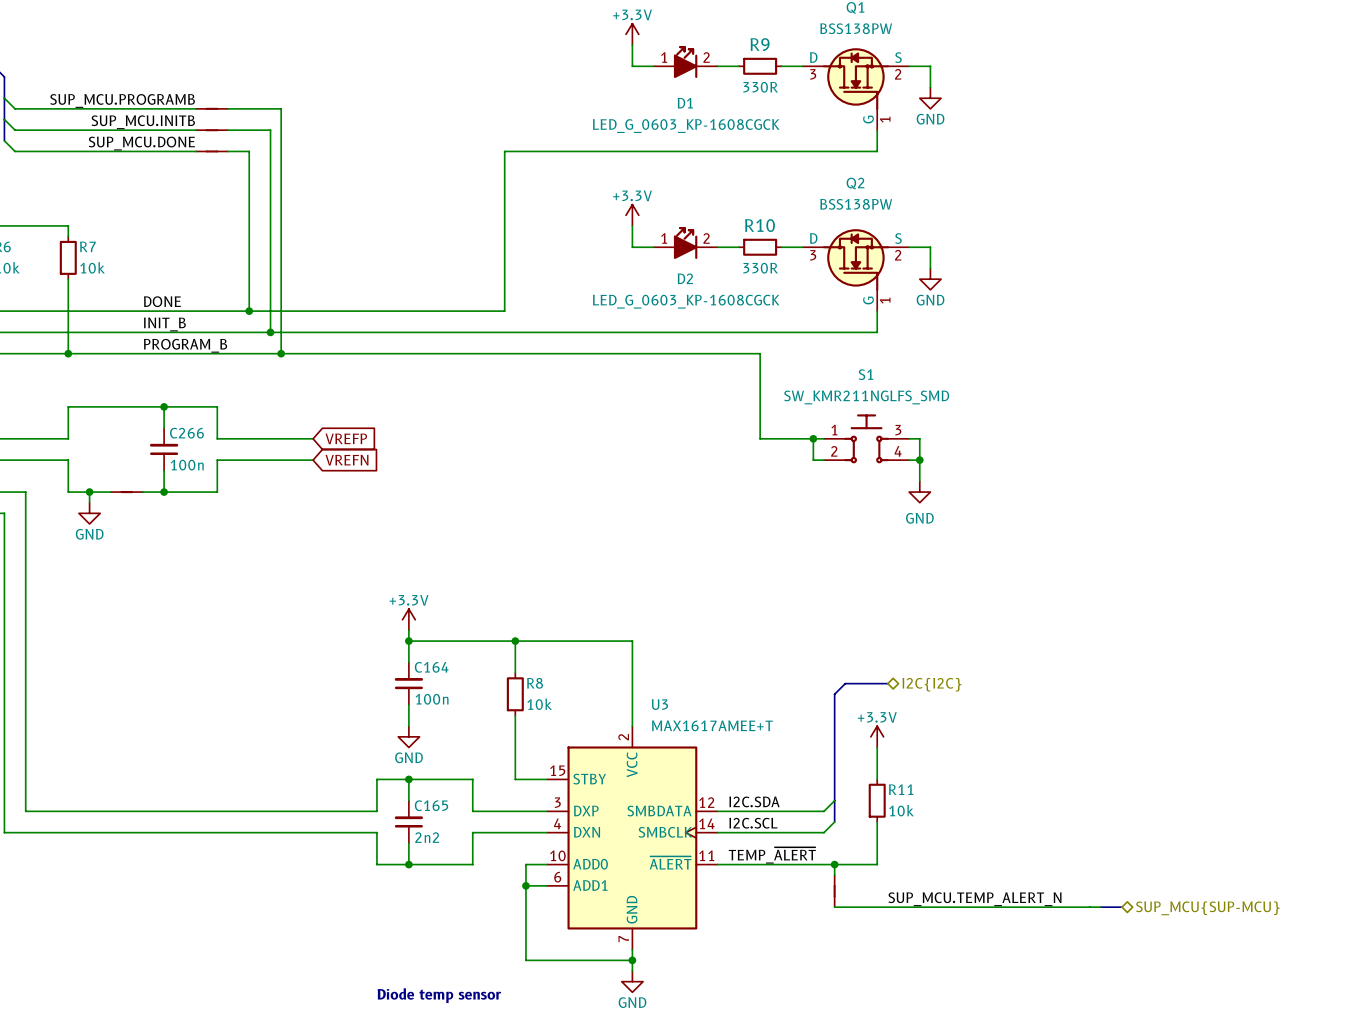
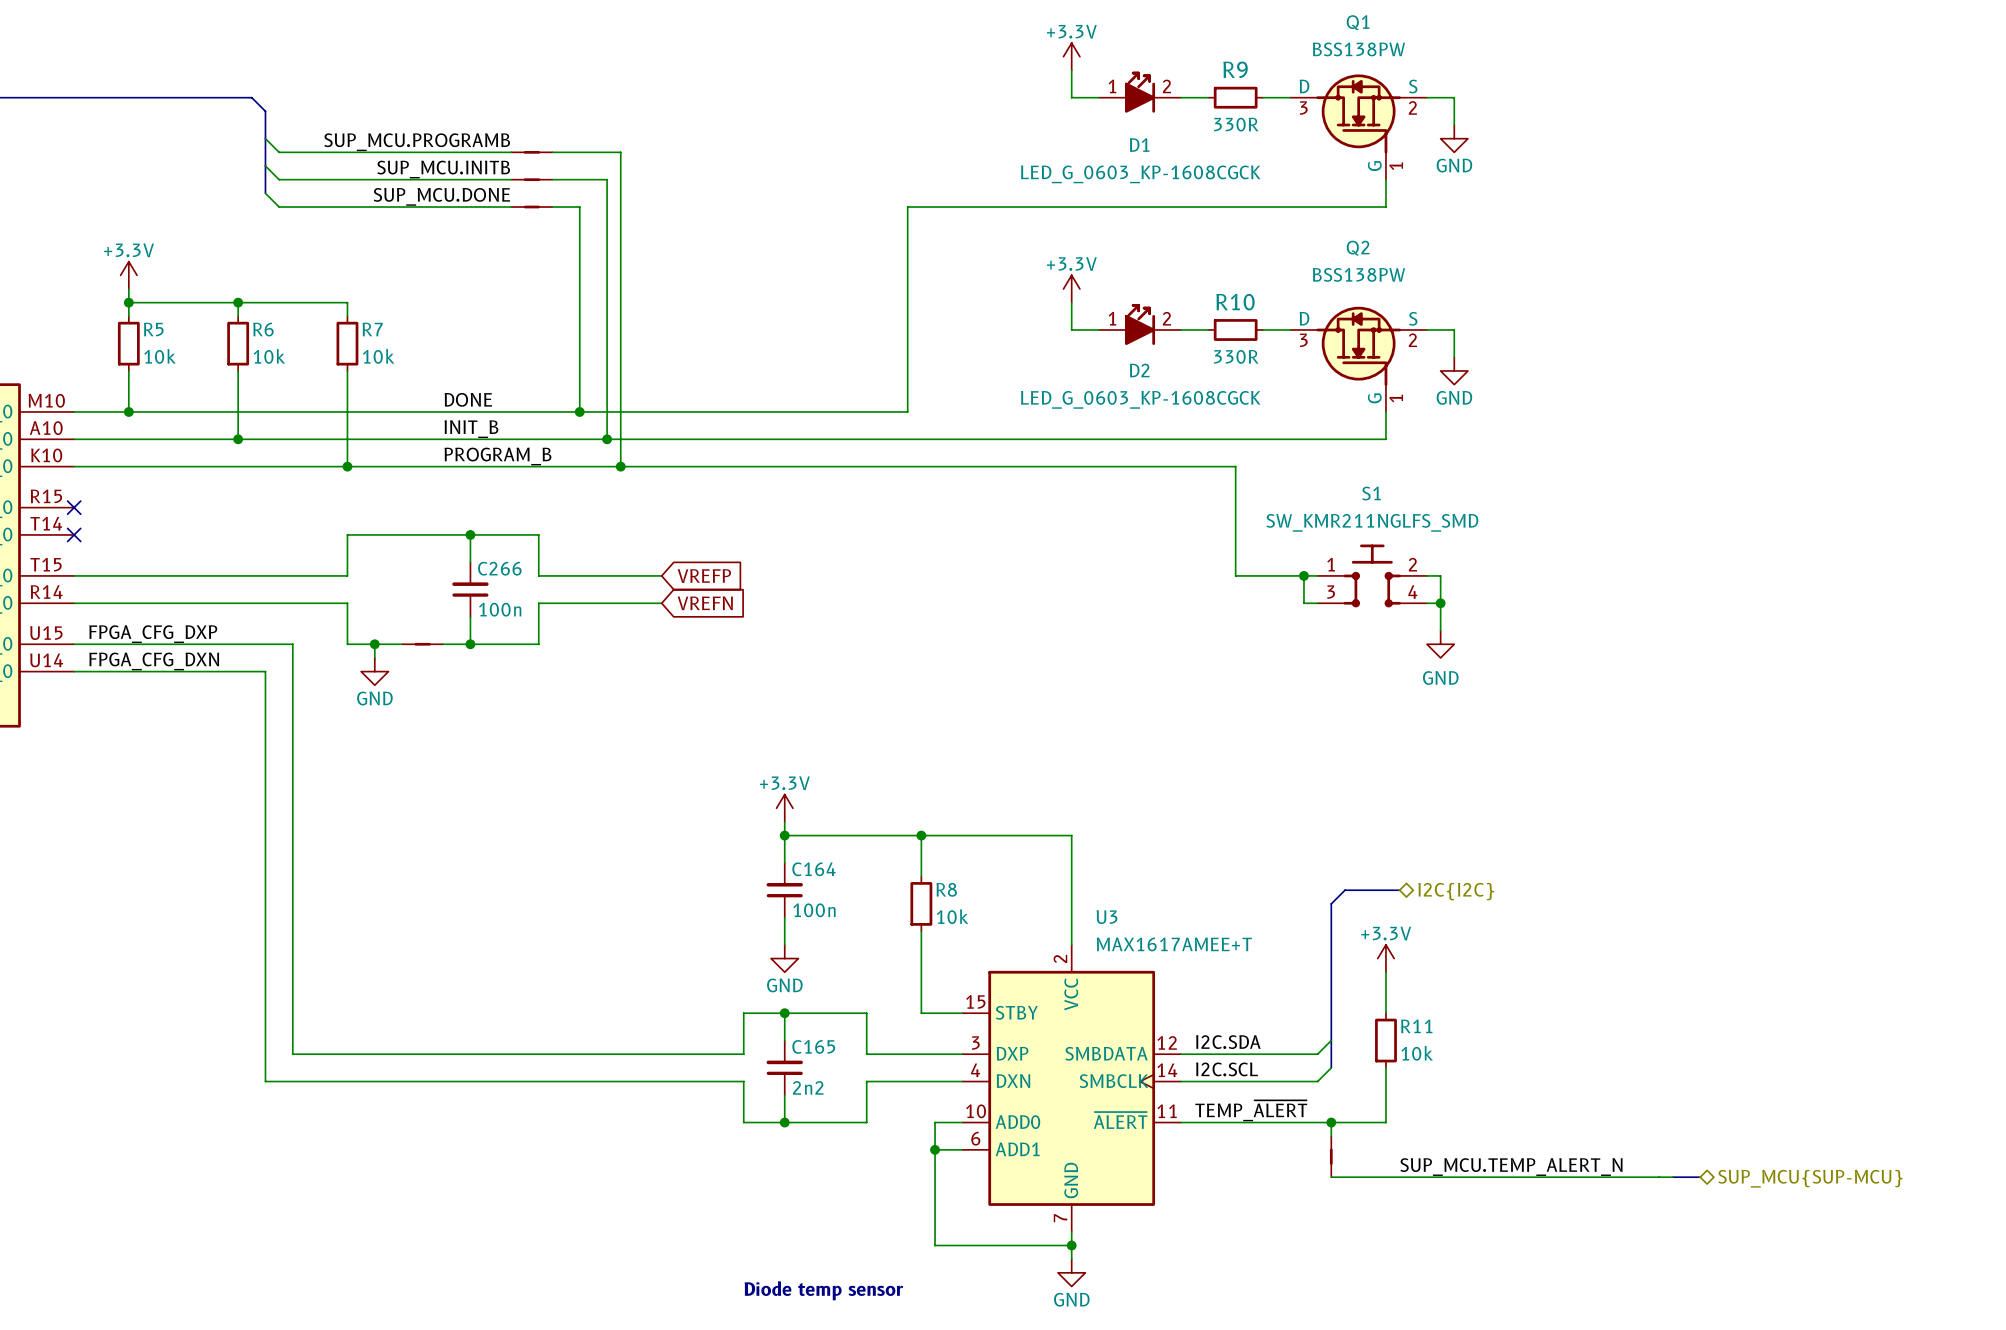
S1 symbol: [823, 414, 910, 464] -> [1317, 544, 1427, 608]

